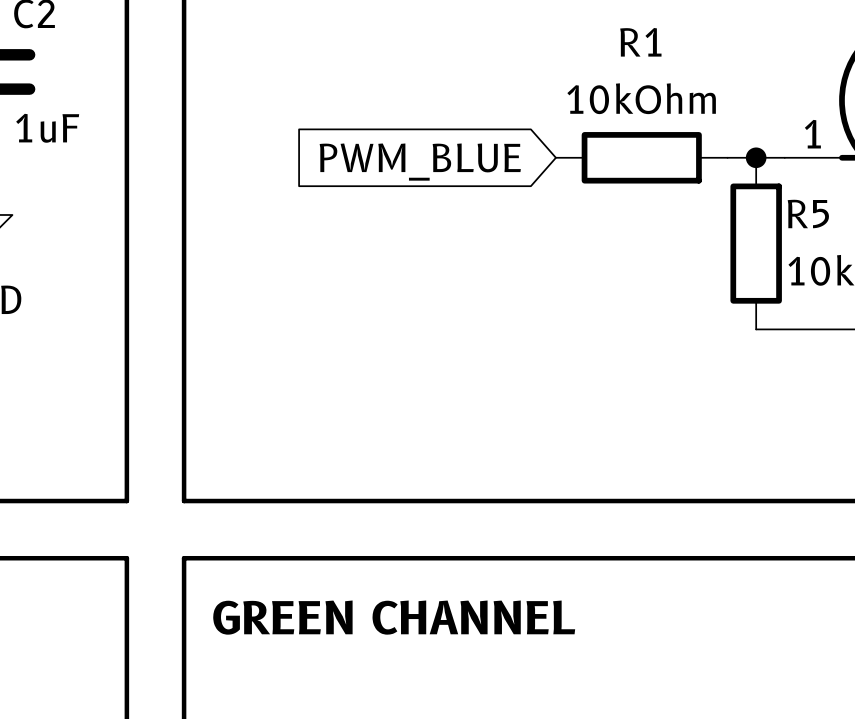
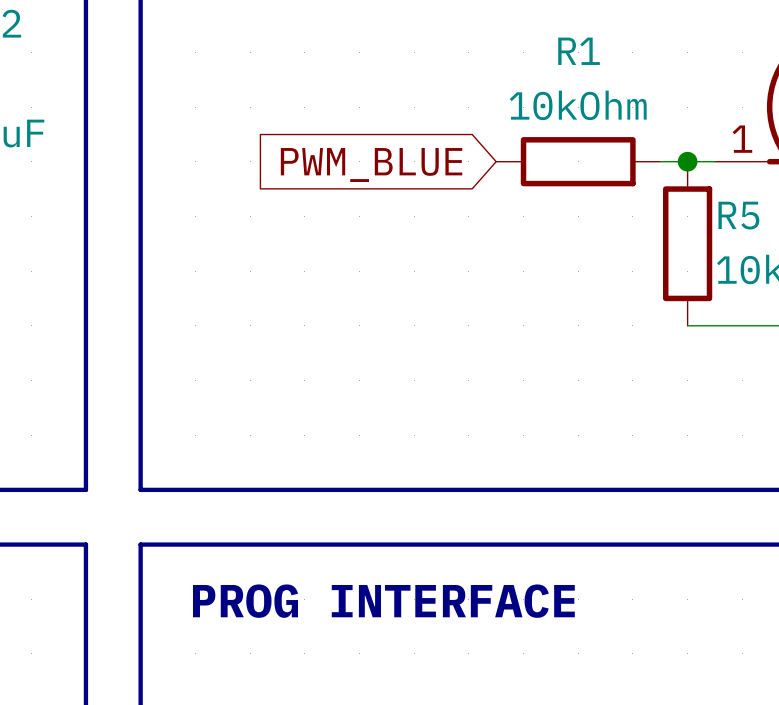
text: GREEN CHANNEL (394, 617) -> none
text: none -> PROG INTERFACE (383, 601)

